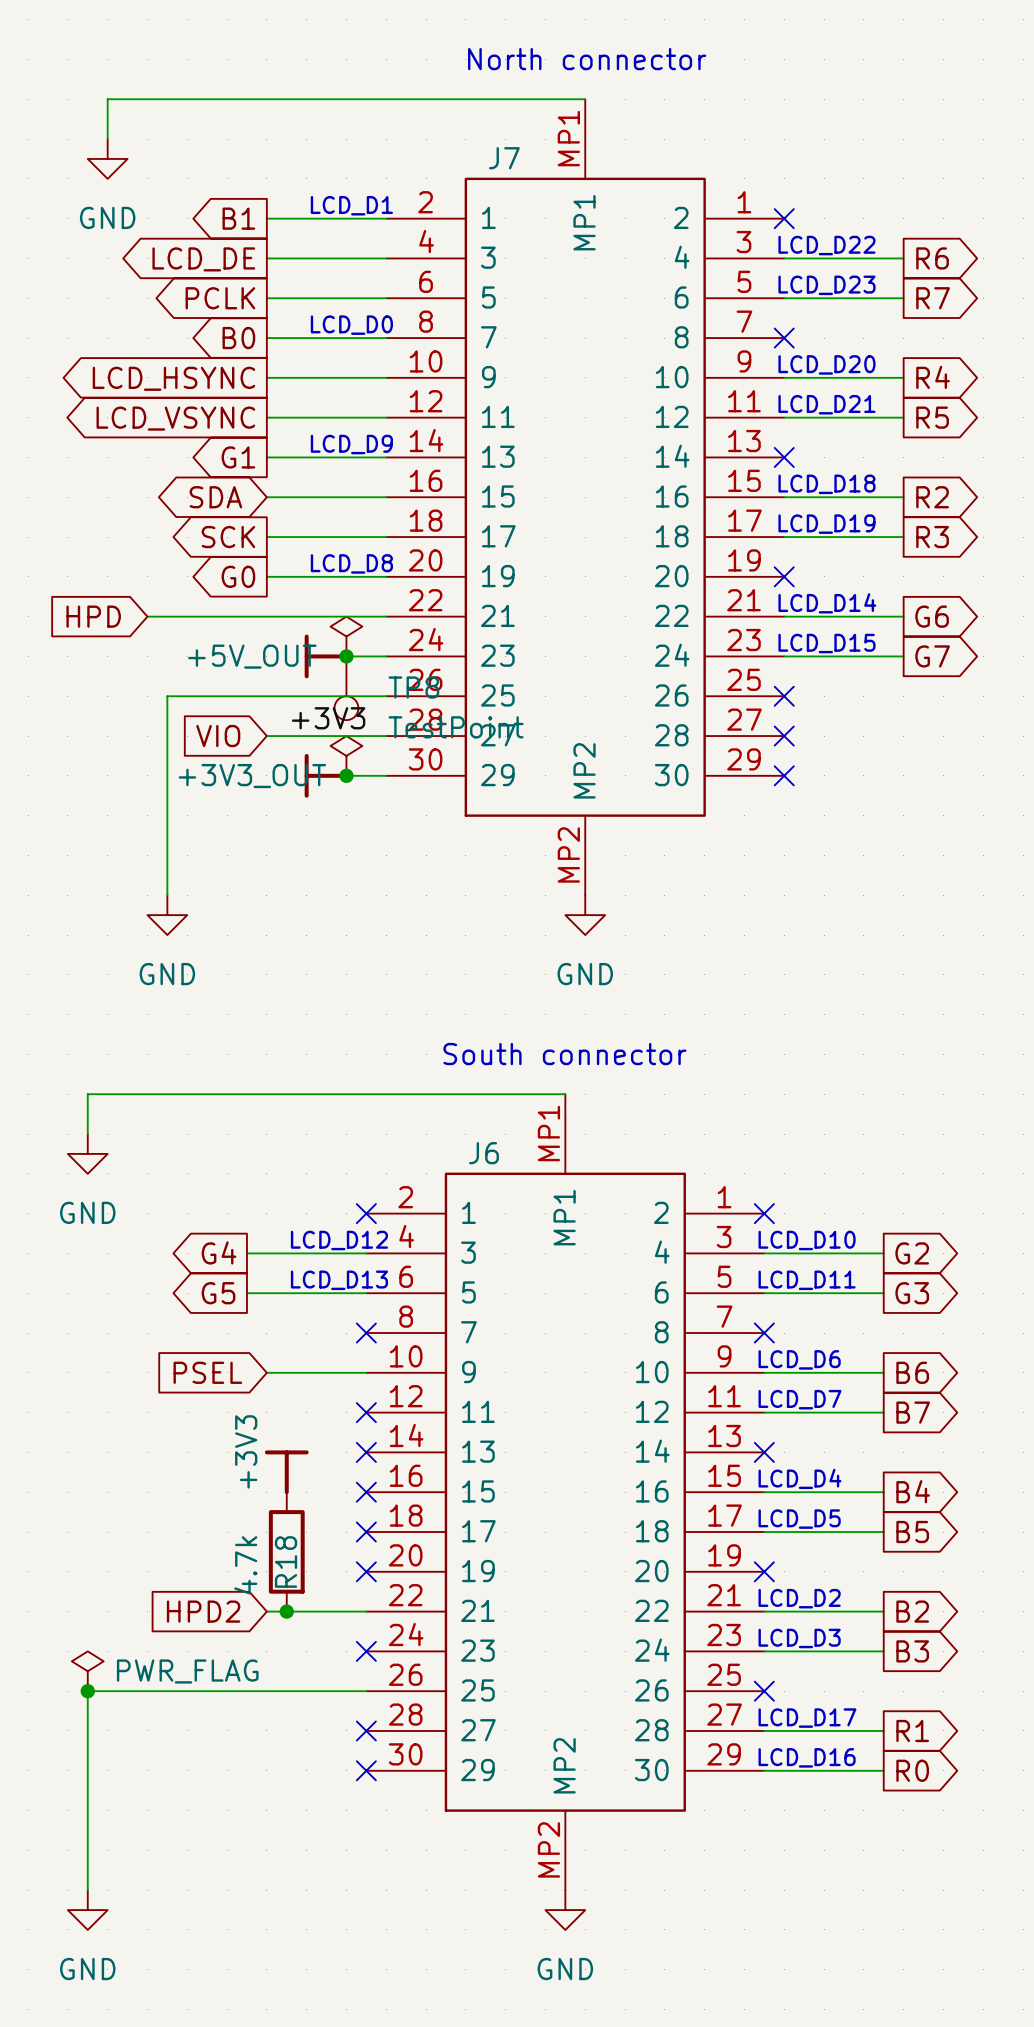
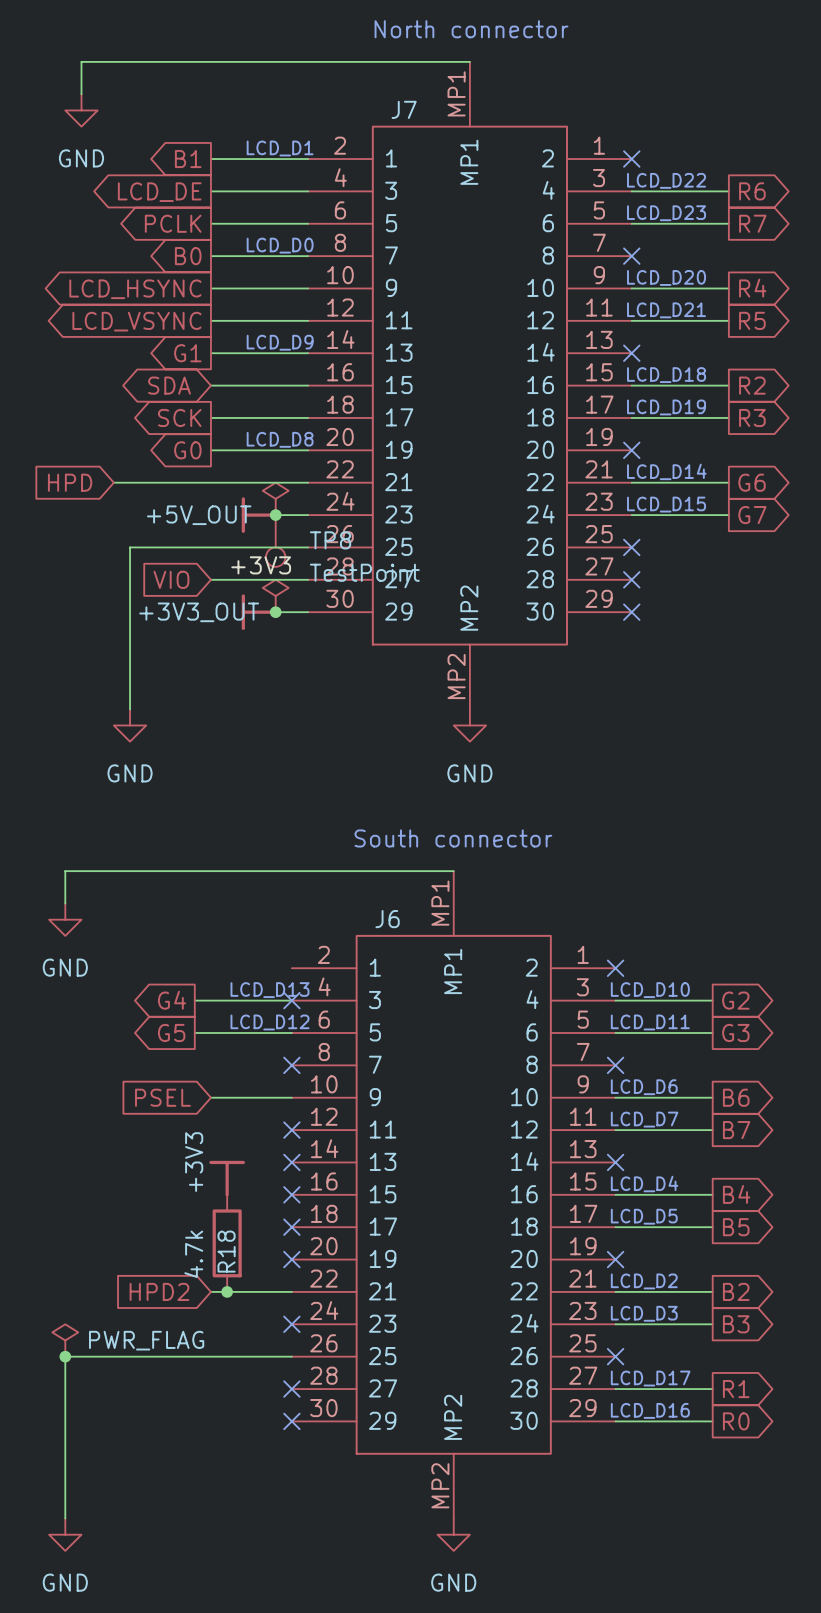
no-connect mark position: (366, 1213) -> (291, 1000)
text: LCD_D12 (339, 1240) -> LCD_D13 (270, 990)
text: LCD_D13 (339, 1280) -> LCD_D12 (270, 1022)

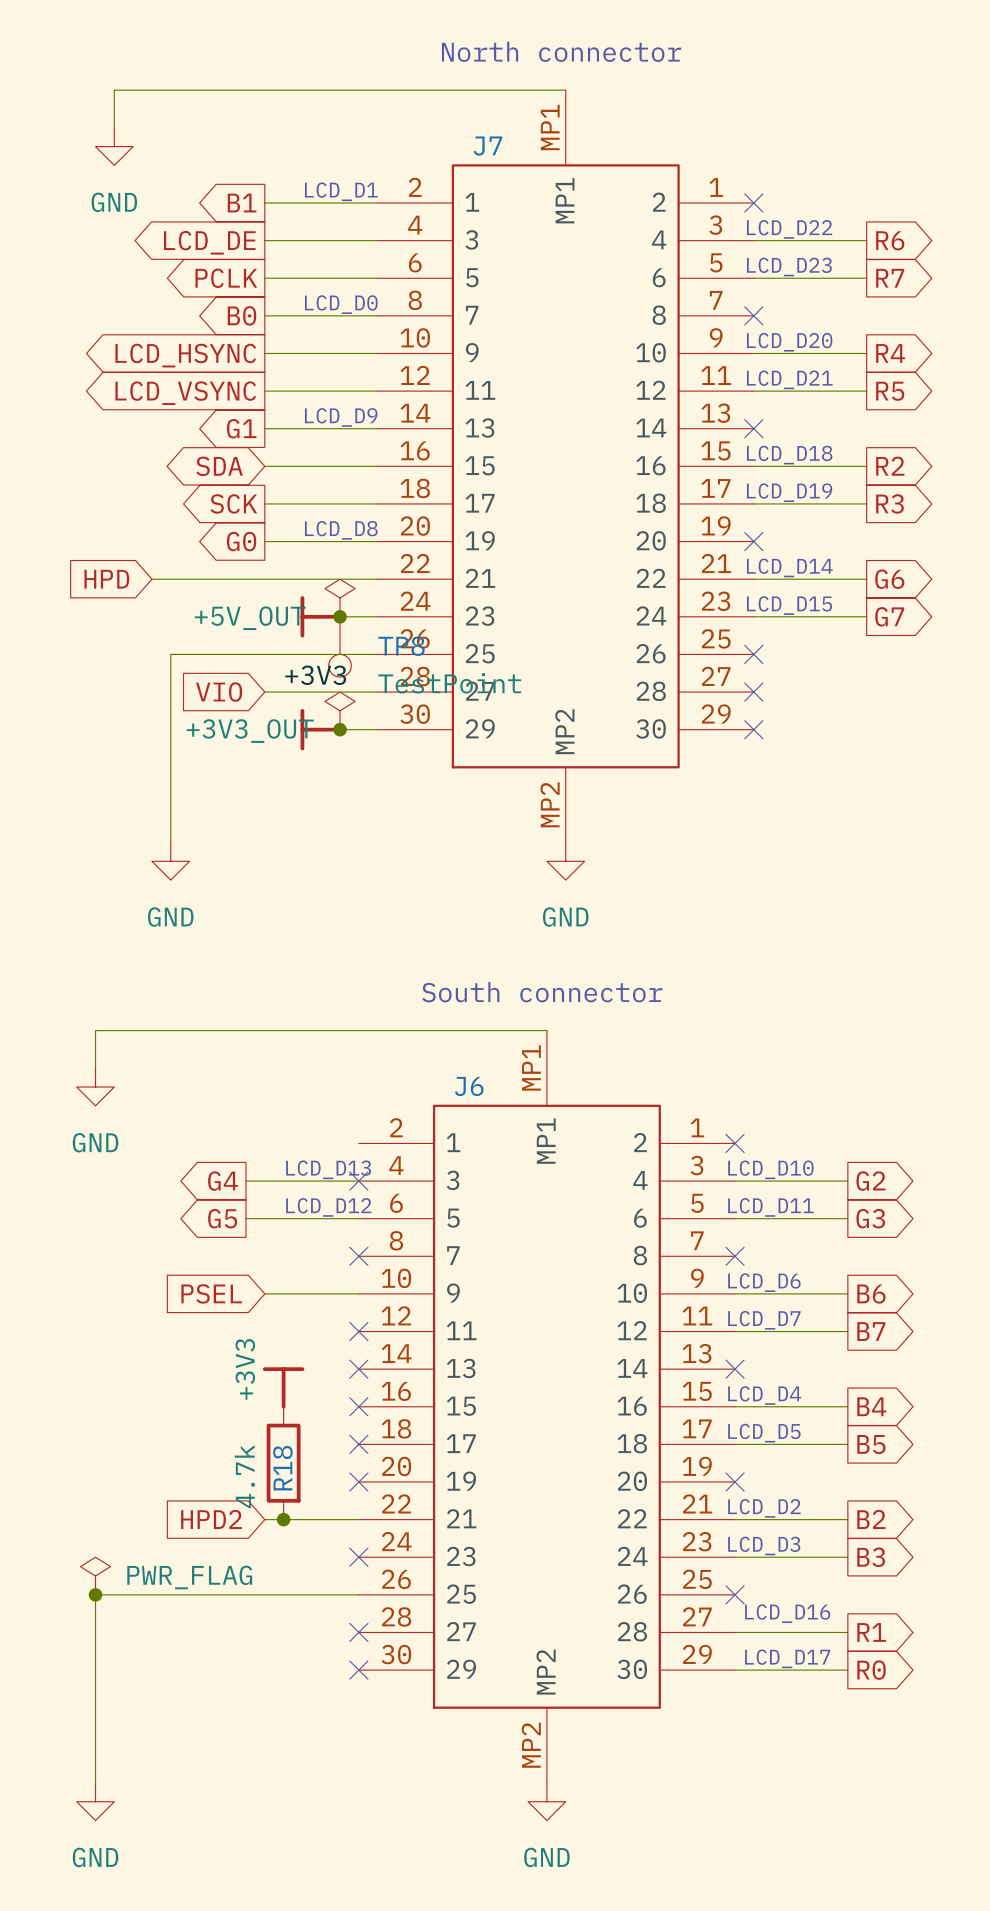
text position: LCD_D17 (650, 1378) -> LCD_D17 (787, 1658)
text position: LCD_D16 (650, 1410) -> LCD_D16 (787, 1613)

